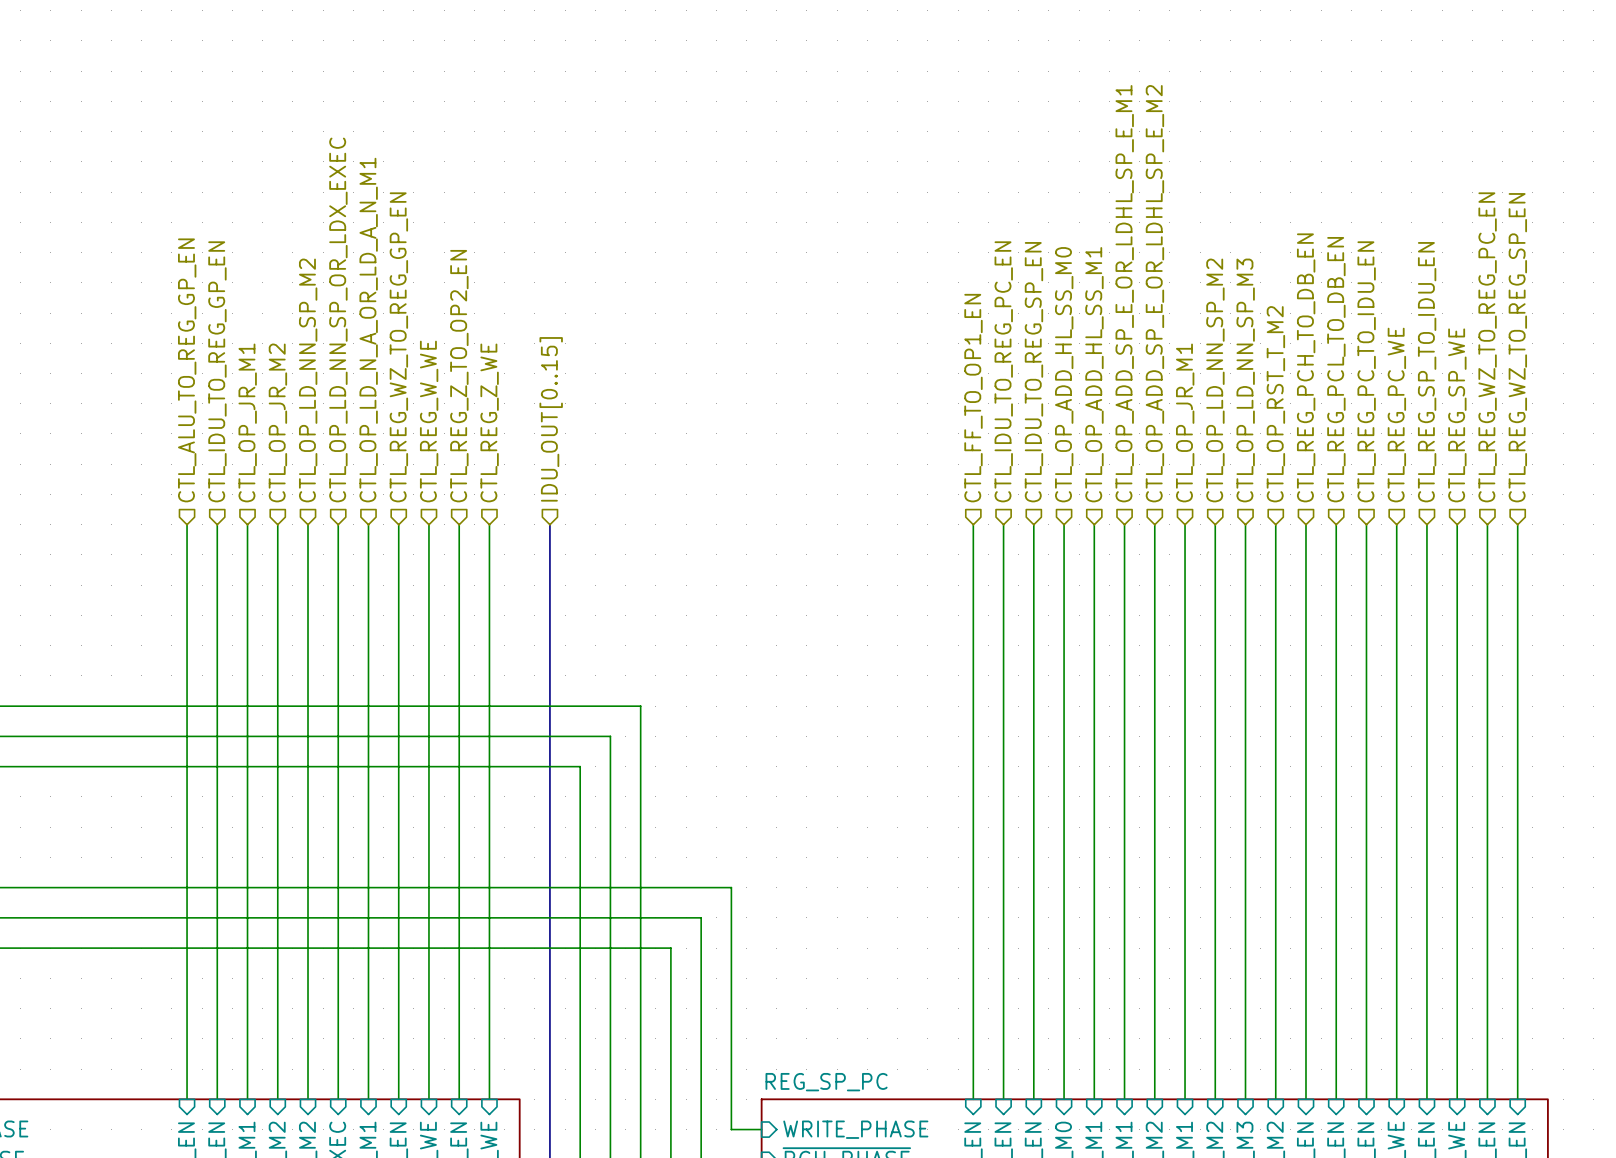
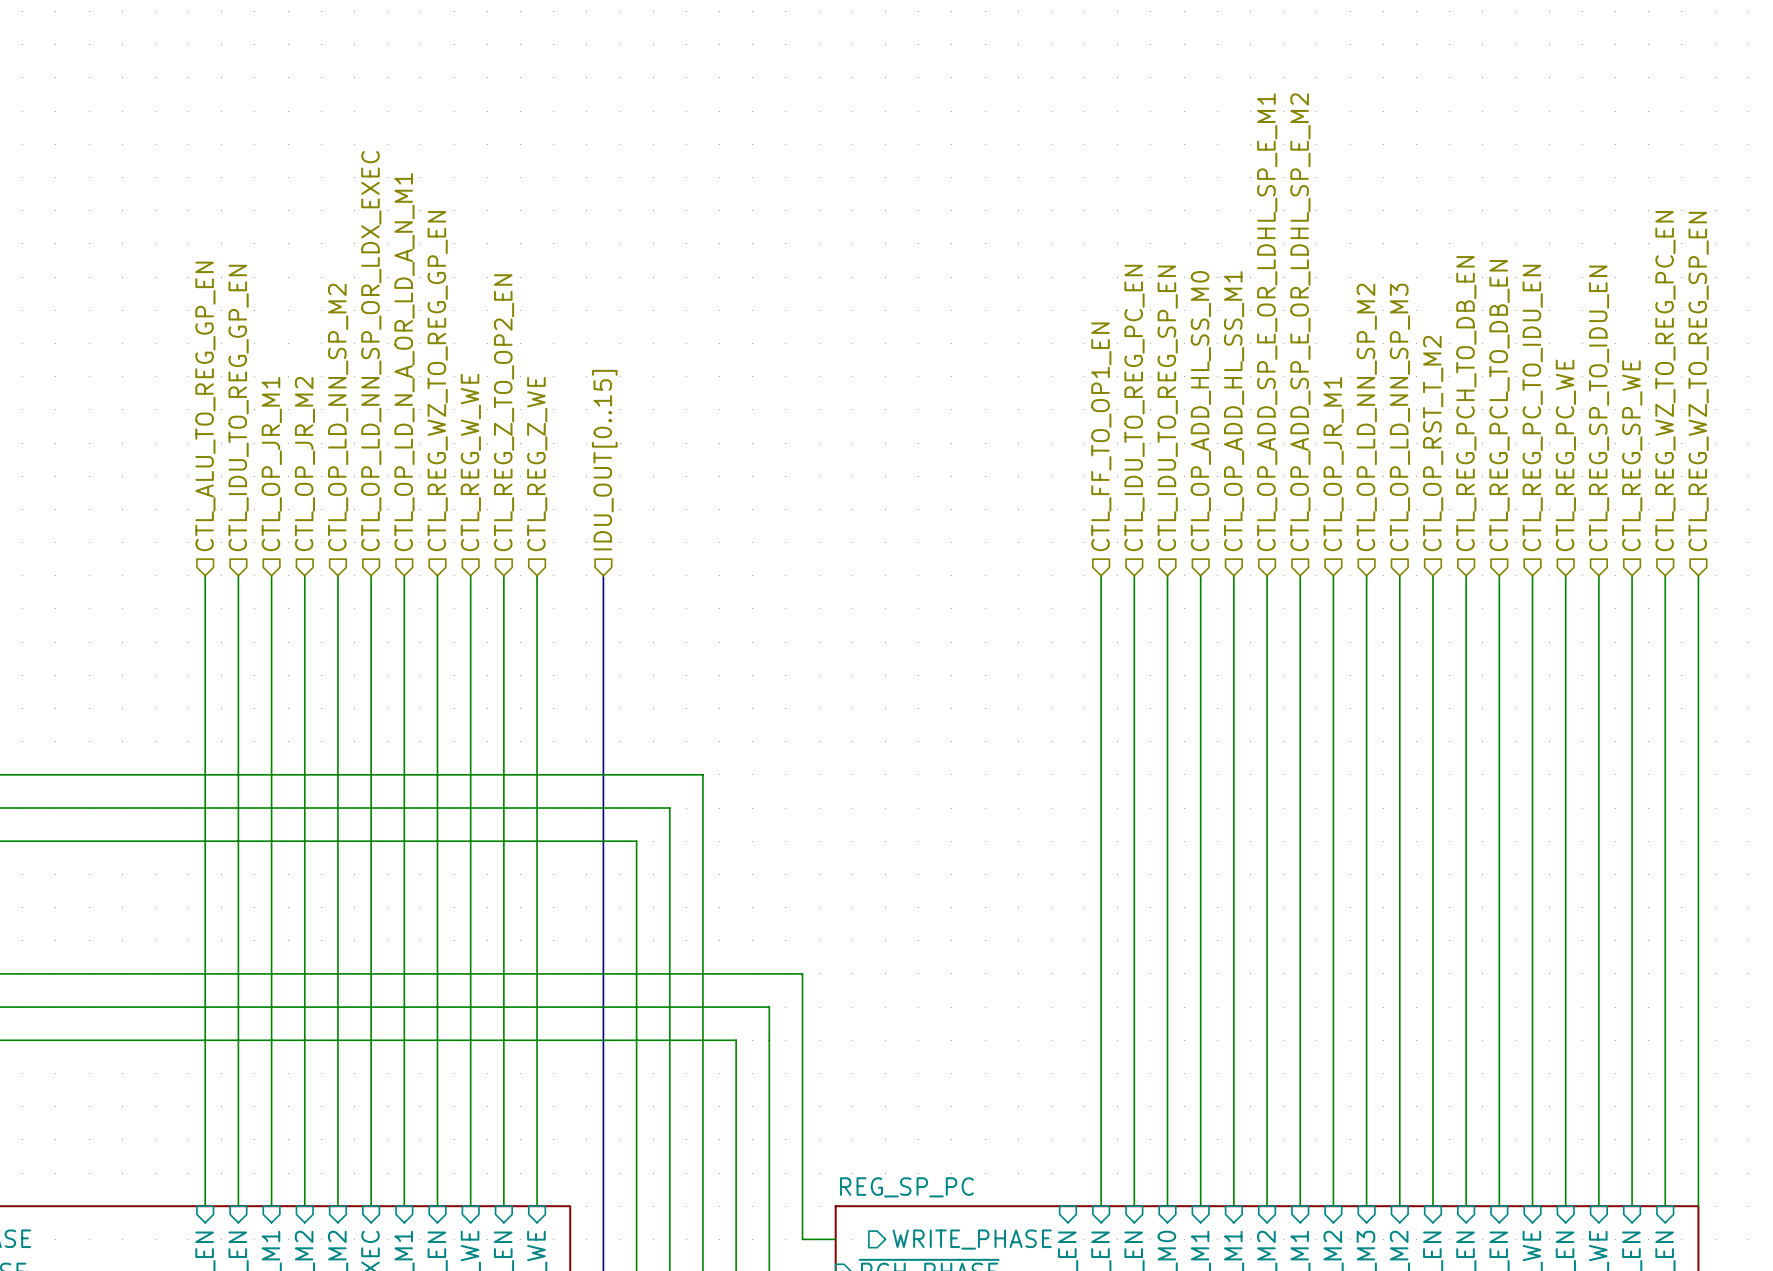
hierarchical label: CTL_OP_ADD_SP_E_OR_LDHL_SP_E_M1 (1124, 293) -> CTL_OP_ADD_HL_SS_M1 (1234, 411)
hierarchical label: CTL_OP_ADD_SP_E_OR_LDHL_SP_E_M2 (1154, 293) -> CTL_OP_ADD_SP_E_OR_LDHL_SP_E_M1 (1267, 322)
hierarchical label: CTL_REG_WZ_TO_REG_PC_EN (1487, 347) -> CTL_REG_SP_WE (1632, 455)
hierarchical label: CTL_REG_WZ_TO_REG_SP_EN (1517, 347) -> CTL_REG_WZ_TO_REG_PC_EN (1665, 381)
hierarchical label: none -> CTL_REG_WZ_TO_REG_SP_EN (1698, 381)
hierarchical label: CTL_REG_PCH_TO_DB_EN (1306, 367) -> CTL_OP_RST_T_M2 (1433, 443)
hierarchical label: CTL_REG_PCL_TO_DB_EN (1336, 369) -> CTL_REG_PCH_TO_DB_EN (1466, 403)
hierarchical label: CTL_IDU_TO_REG_PC_EN (1003, 371) -> CTL_FF_TO_OP1_EN (1101, 436)
hierarchical label: CTL_REG_PC_TO_IDU_EN (1366, 371) -> CTL_REG_PCL_TO_DB_EN (1499, 405)
hierarchical label: CTL_IDU_TO_REG_SP_EN (1033, 372) -> CTL_IDU_TO_REG_PC_EN (1134, 407)
hierarchical label: CTL_REG_SP_TO_IDU_EN (1427, 372) -> CTL_REG_PC_WE (1565, 455)
hierarchical label: CTL_OP_ADD_HL_SS_M0 (1064, 374) -> CTL_IDU_TO_REG_SP_EN (1167, 408)
hierarchical label: CTL_OP_ADD_HL_SS_M1 (1094, 374) -> CTL_OP_ADD_HL_SS_M0 (1200, 411)
hierarchical label: CTL_OP_LD_NN_SP_M2 (1215, 380) -> CTL_OP_JR_M1 (1333, 464)
hierarchical label: CTL_OP_LD_NN_SP_M3 (1245, 380) -> CTL_OP_LD_NN_SP_M2 (1366, 417)
hierarchical label: CTL_FF_TO_OP1_EN (973, 398) -> none
hierarchical label: CTL_OP_RST_T_M2 (1275, 404) -> CTL_OP_LD_NN_SP_M3 (1399, 417)
hierarchical label: CTL_REG_PC_WE (1396, 415) -> CTL_REG_PC_TO_IDU_EN (1532, 407)
hierarchical label: CTL_REG_SP_WE (1457, 415) -> CTL_REG_SP_TO_IDU_EN (1599, 408)
hierarchical label: CTL_OP_JR_M1 (1185, 422) -> CTL_OP_ADD_SP_E_OR_LDHL_SP_E_M2 (1300, 322)
wire: (973, 524) (973, 1099) -> none
wire: none -> (1698, 575) (1698, 1206)
sheet pin position: WRITE_PHASE (855, 1129) -> WRITE_PHASE (972, 1239)

